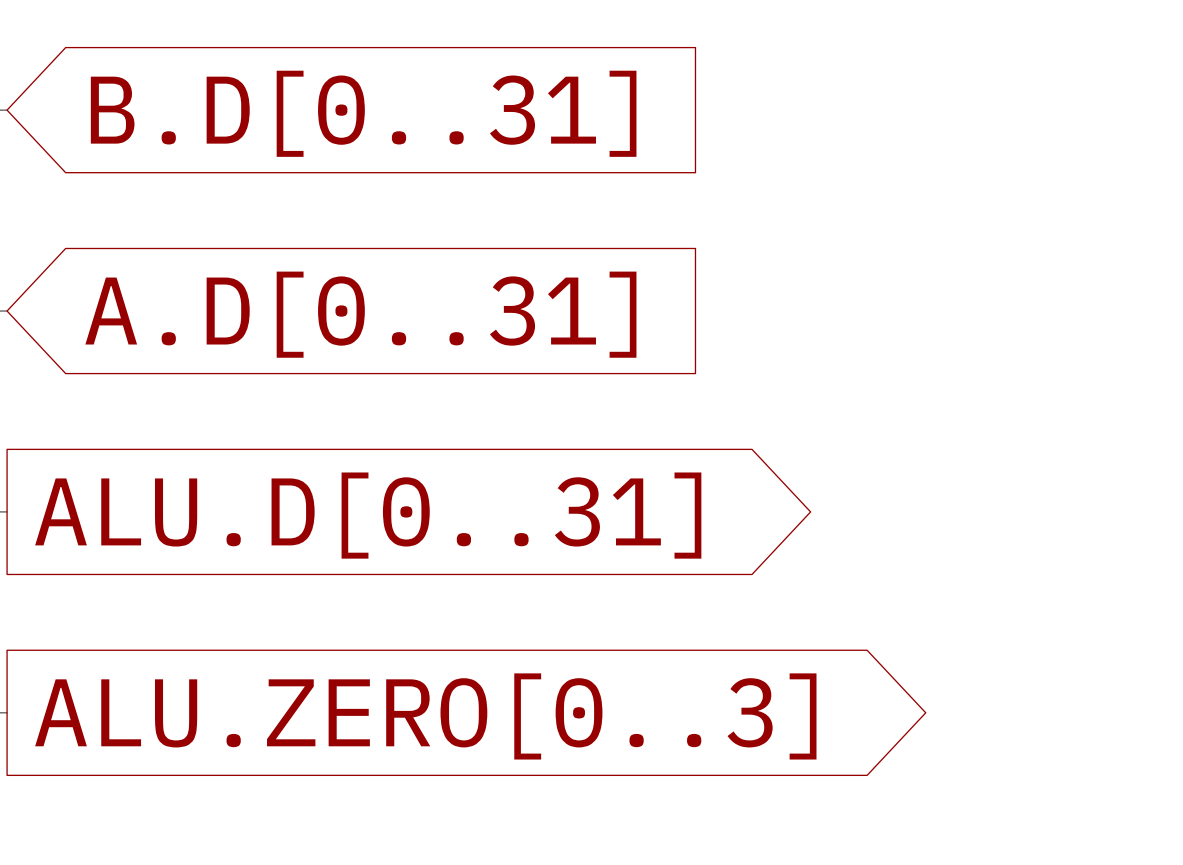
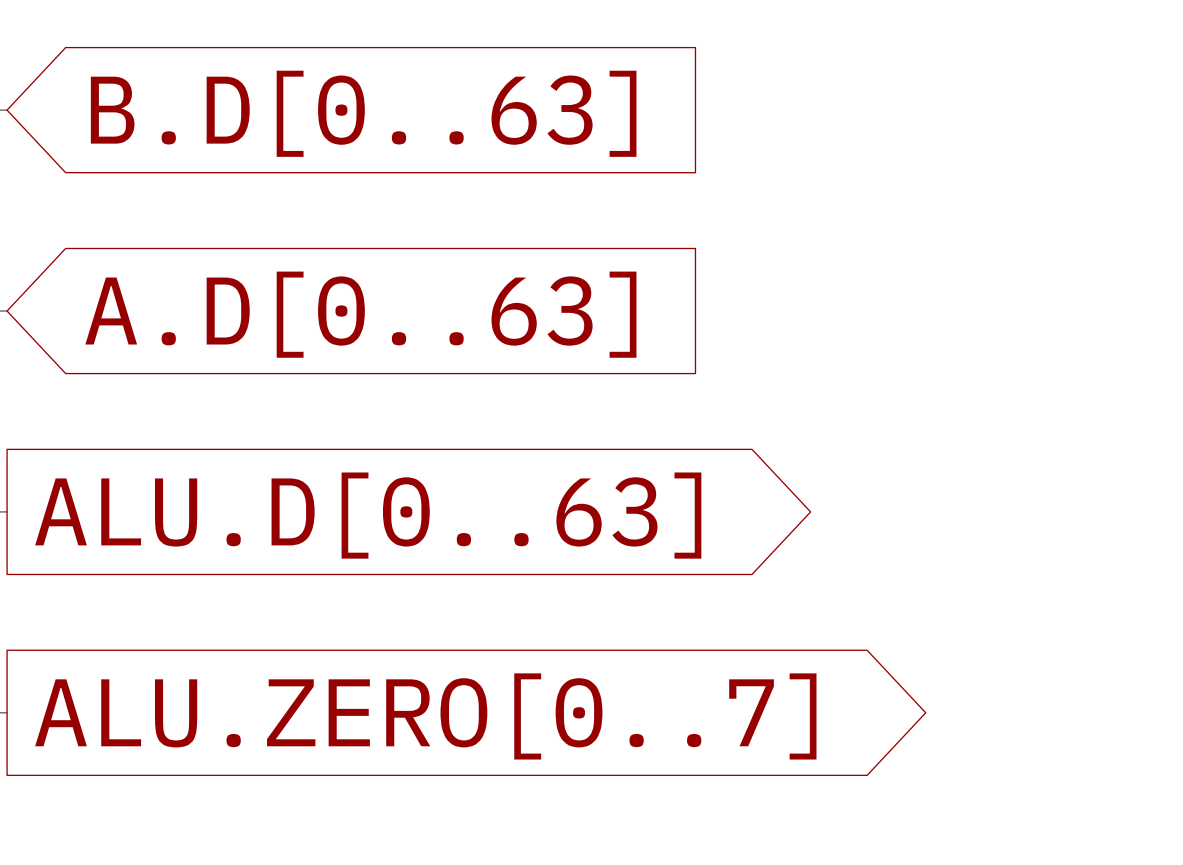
global label: B.D[0..31] (363, 113) -> B.D[0..63] (363, 113)
global label: A.D[0..31] (360, 314) -> A.D[0..63] (360, 314)
global label: ALU.D[0..31] (368, 515) -> ALU.D[0..63] (368, 515)
global label: ALU.ZERO[0..3] (425, 716) -> ALU.ZERO[0..7] (425, 716)

